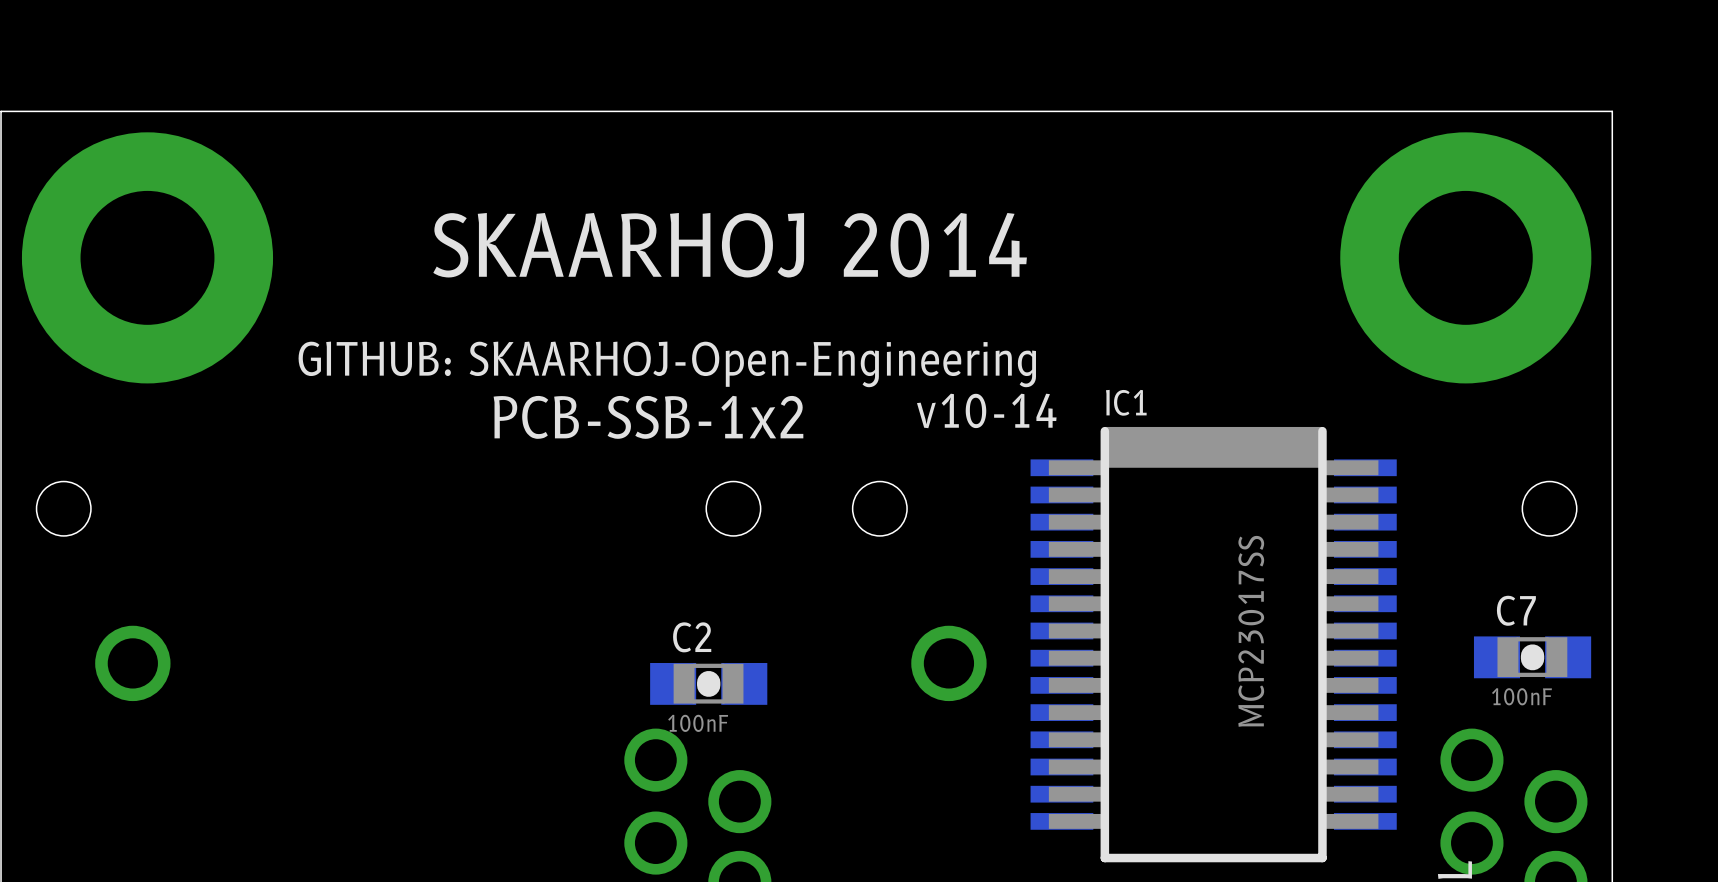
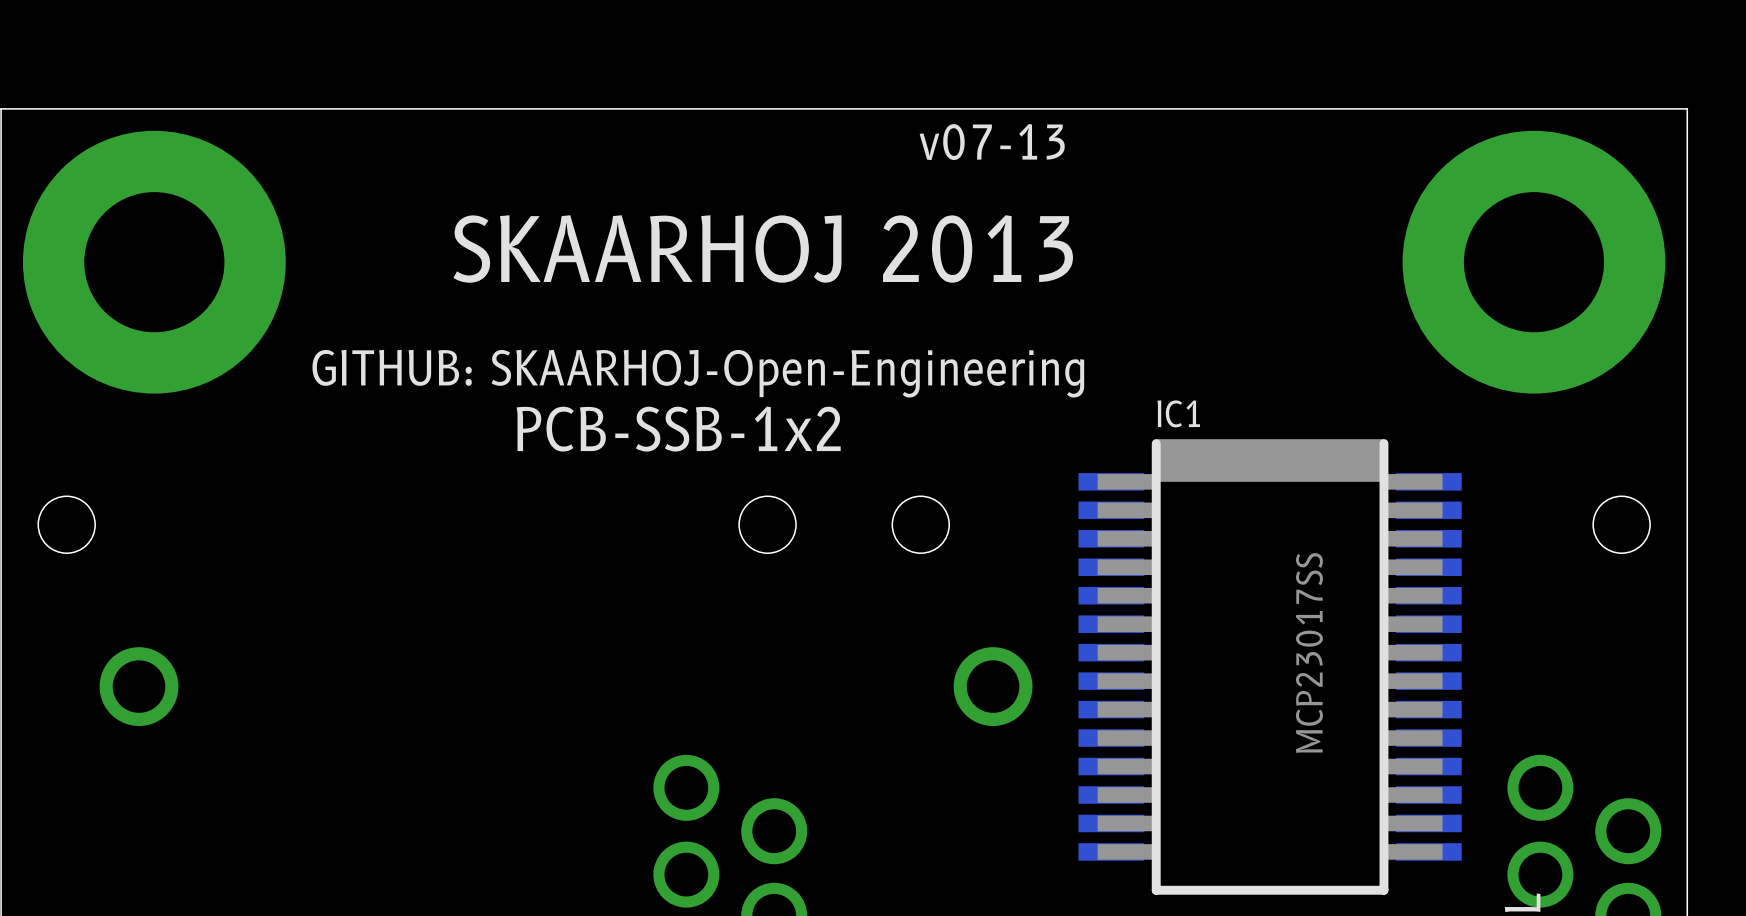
text: none -> v07-13 (992, 142)
text: SKAARHOJ 2014 (730, 245) -> SKAARHOJ 2013 (763, 248)
text: v10-14 (986, 410) -> none
C7: 100nF (1532, 657) -> none
C2: 100nF (708, 683) -> none

